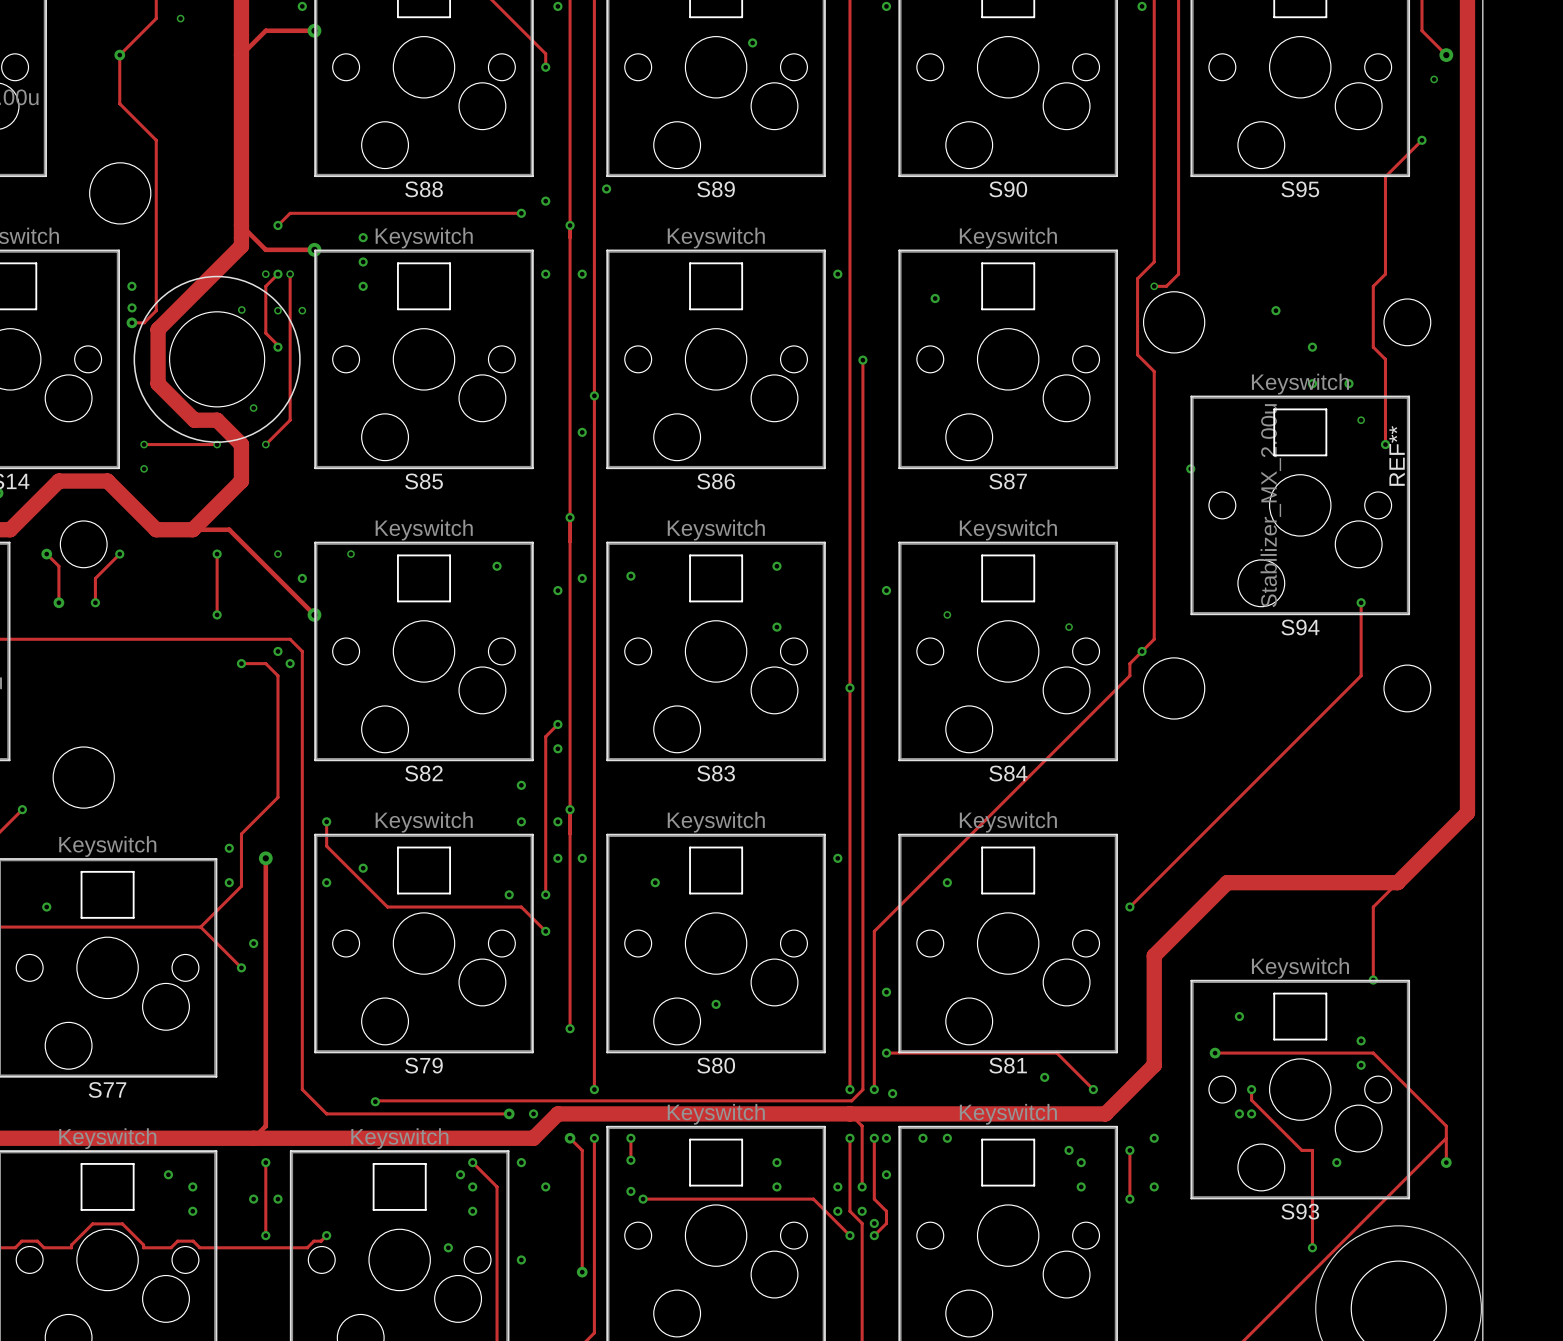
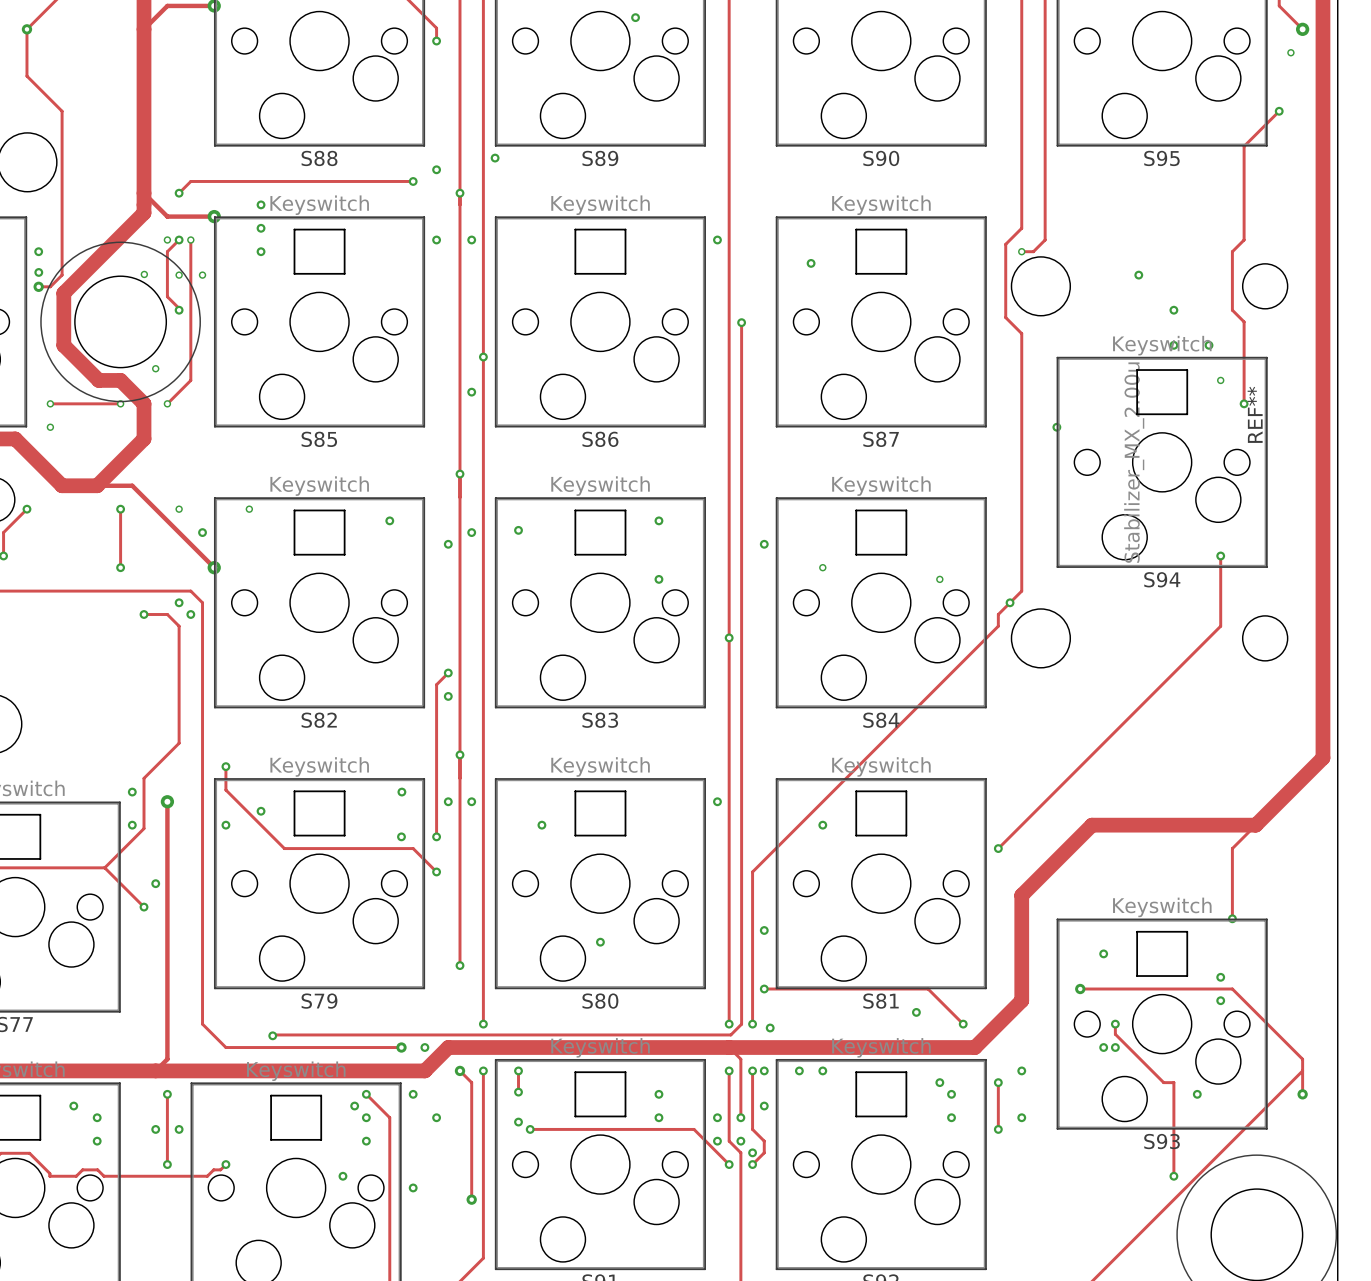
via: (521, 785) -> none
via: (521, 821) -> none
via: (557, 821) -> none
via: none -> (401, 792)

